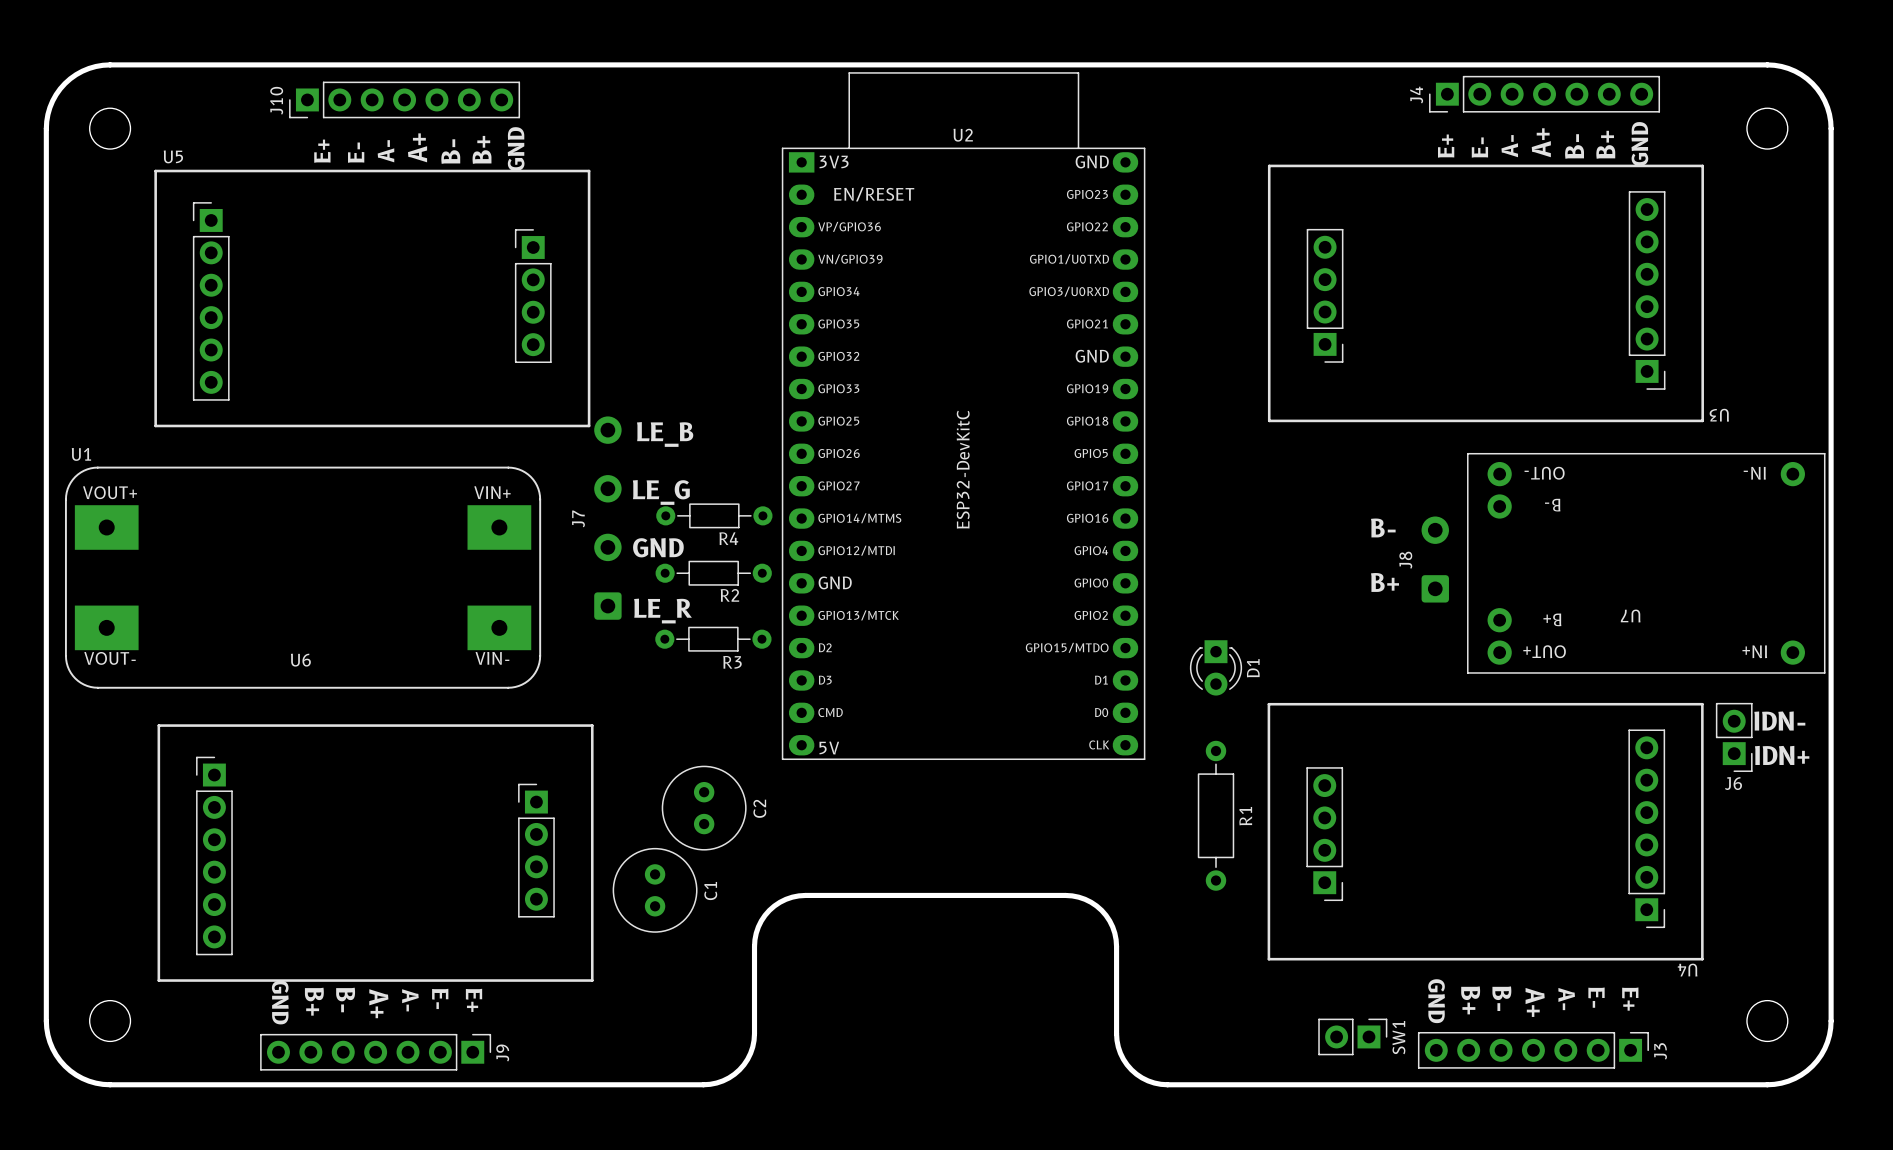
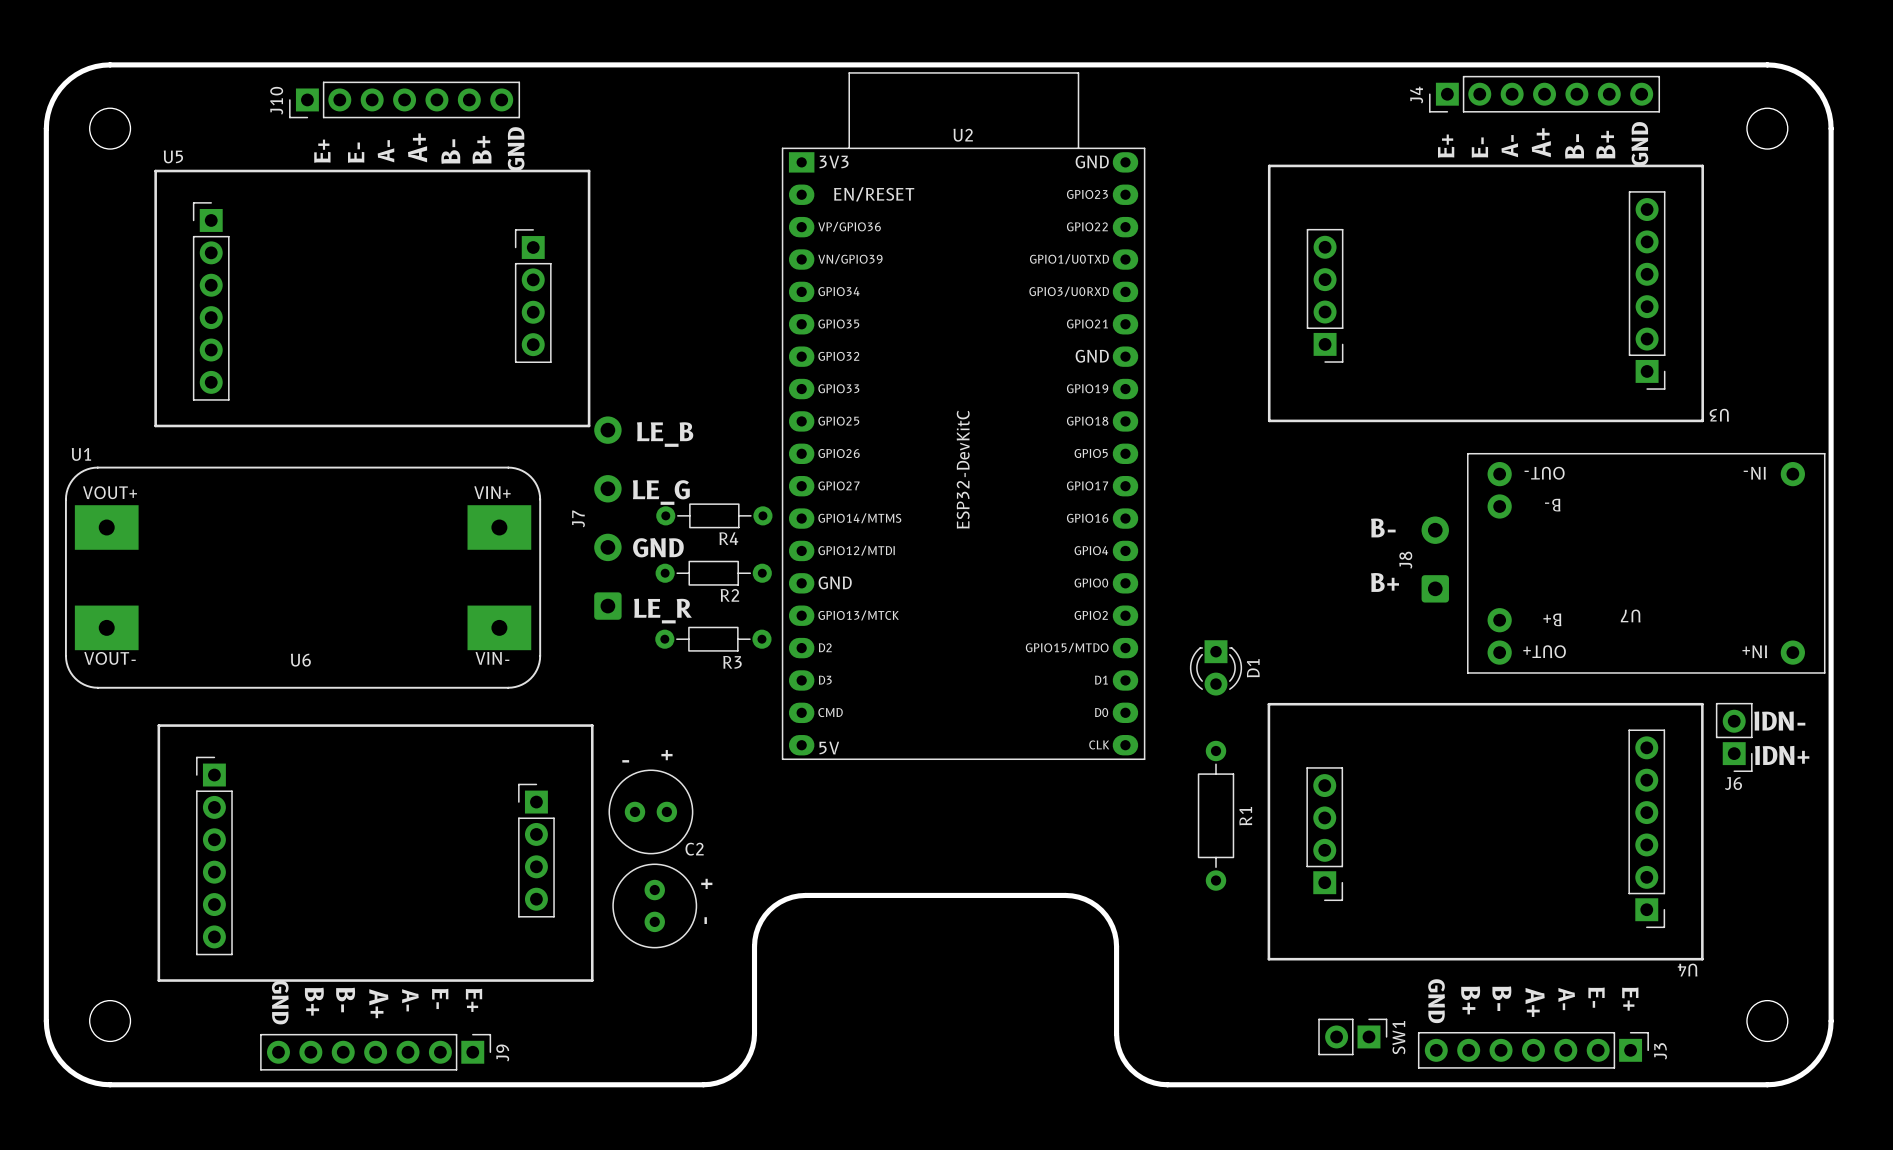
text: none -> + (666, 755)
text: none -> - (625, 761)
C2 rotation: 0° (704, 808) -> 90° clockwise (650, 811)
C2 position: (704, 808) -> (650, 811)
C2 name position: C2 (759, 808) -> C2 (694, 849)
text: none -> + (706, 883)
C1: (655, 890) -> none
part: none -> (654, 905)
text: none -> - (705, 920)

